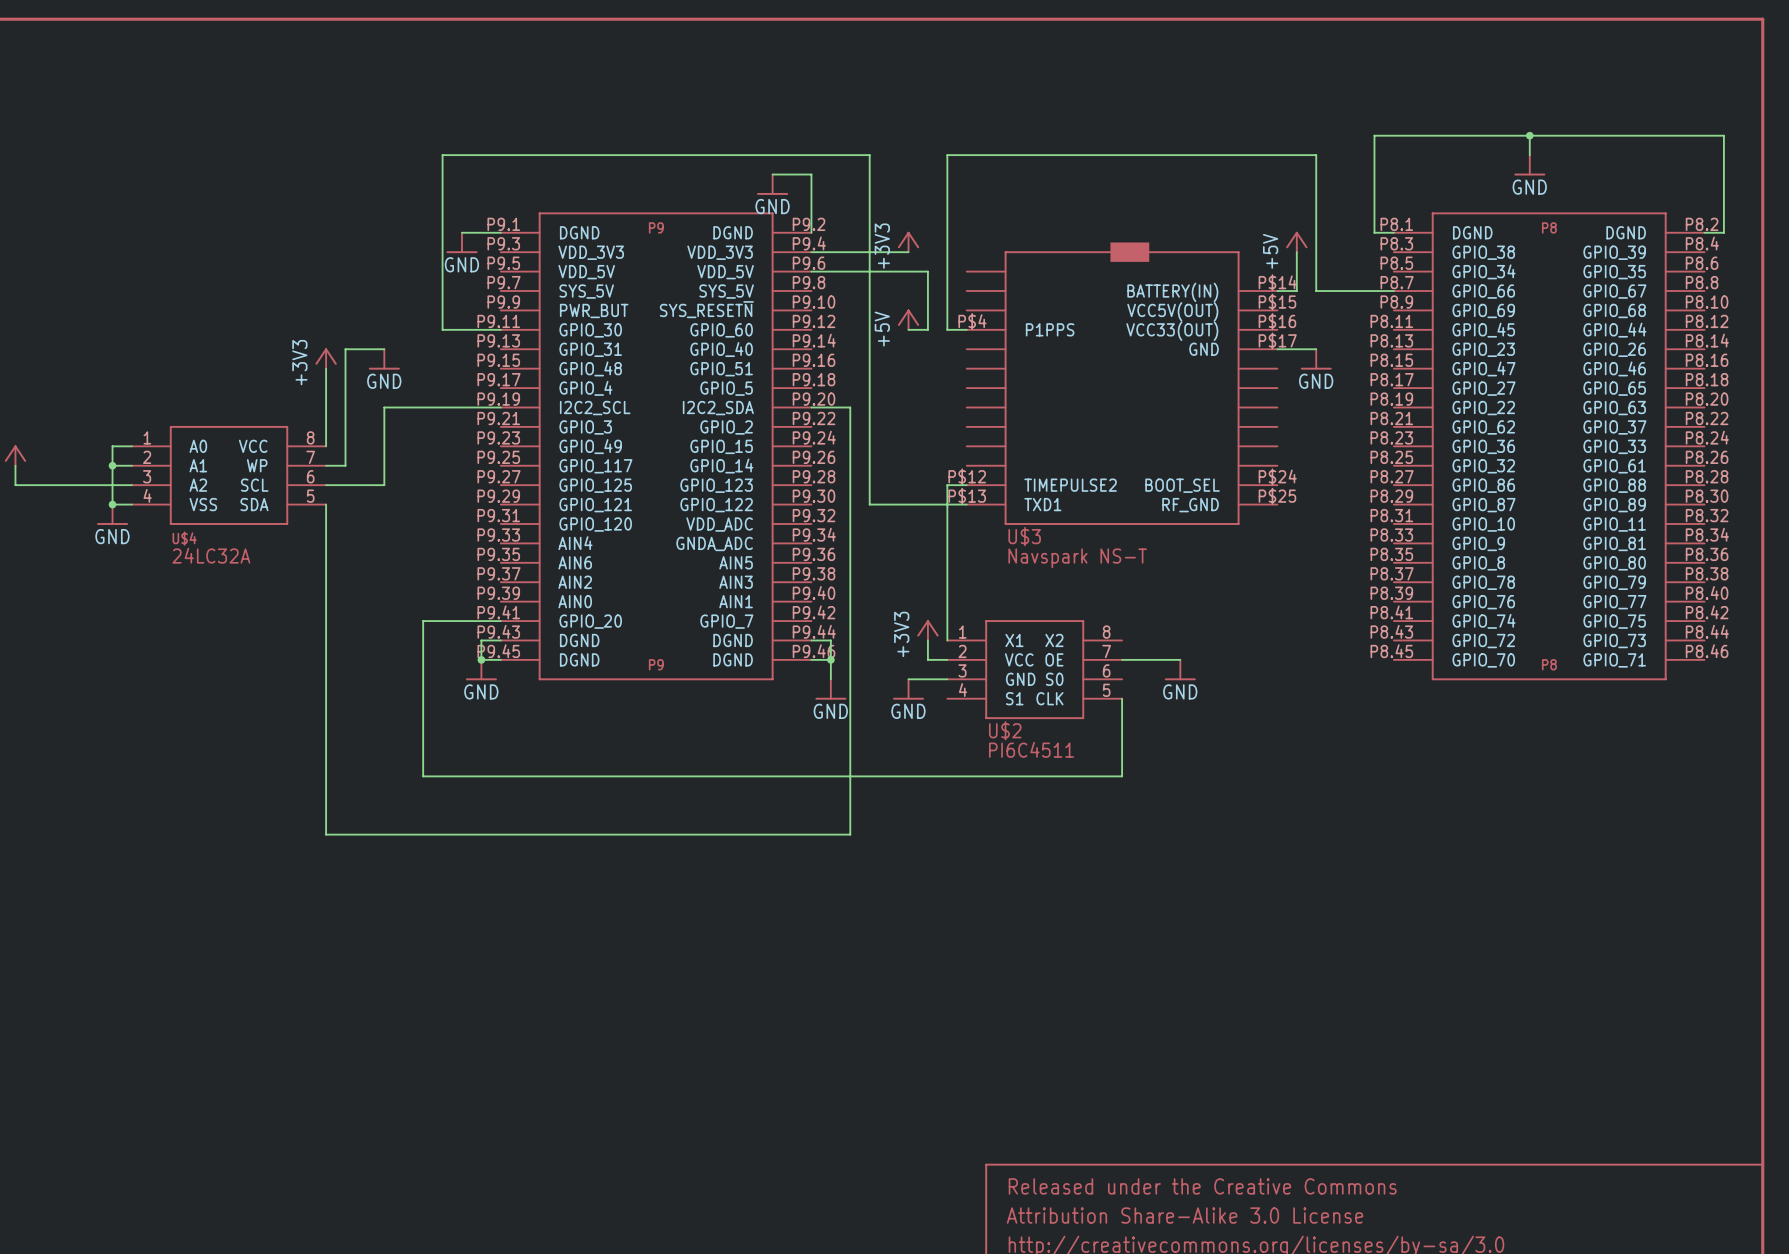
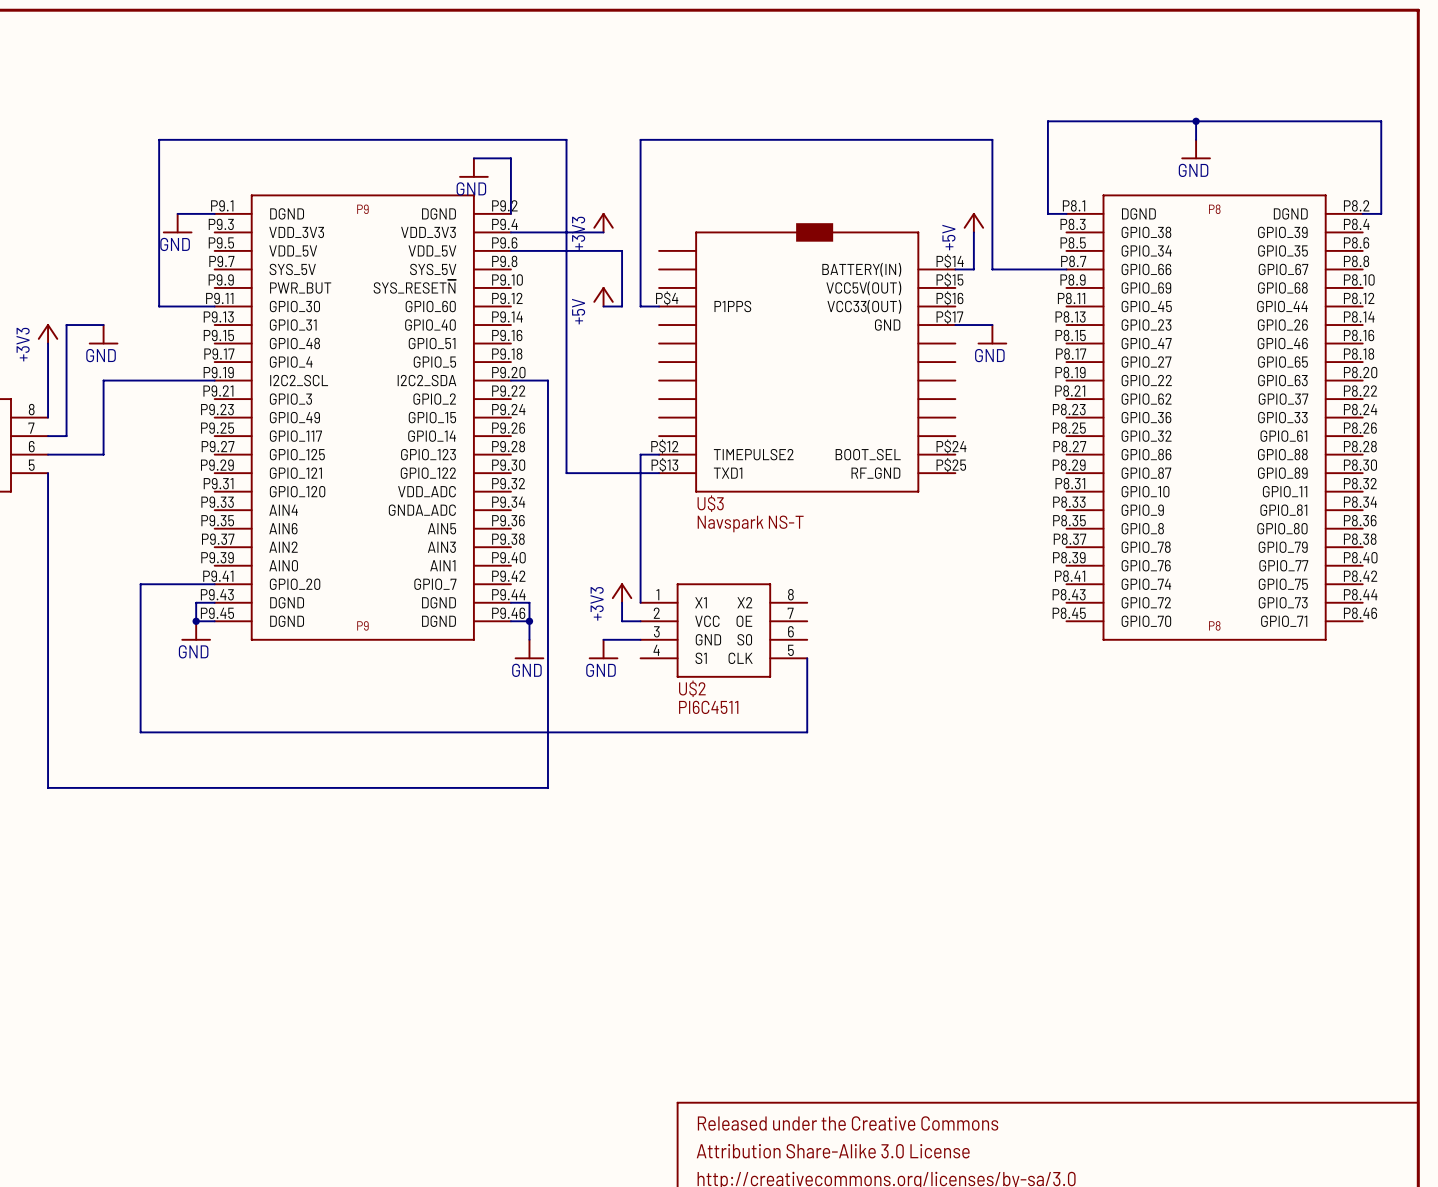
wire: (1122, 659) (1180, 659) -> none
power symbol: GND (1180, 670) -> none

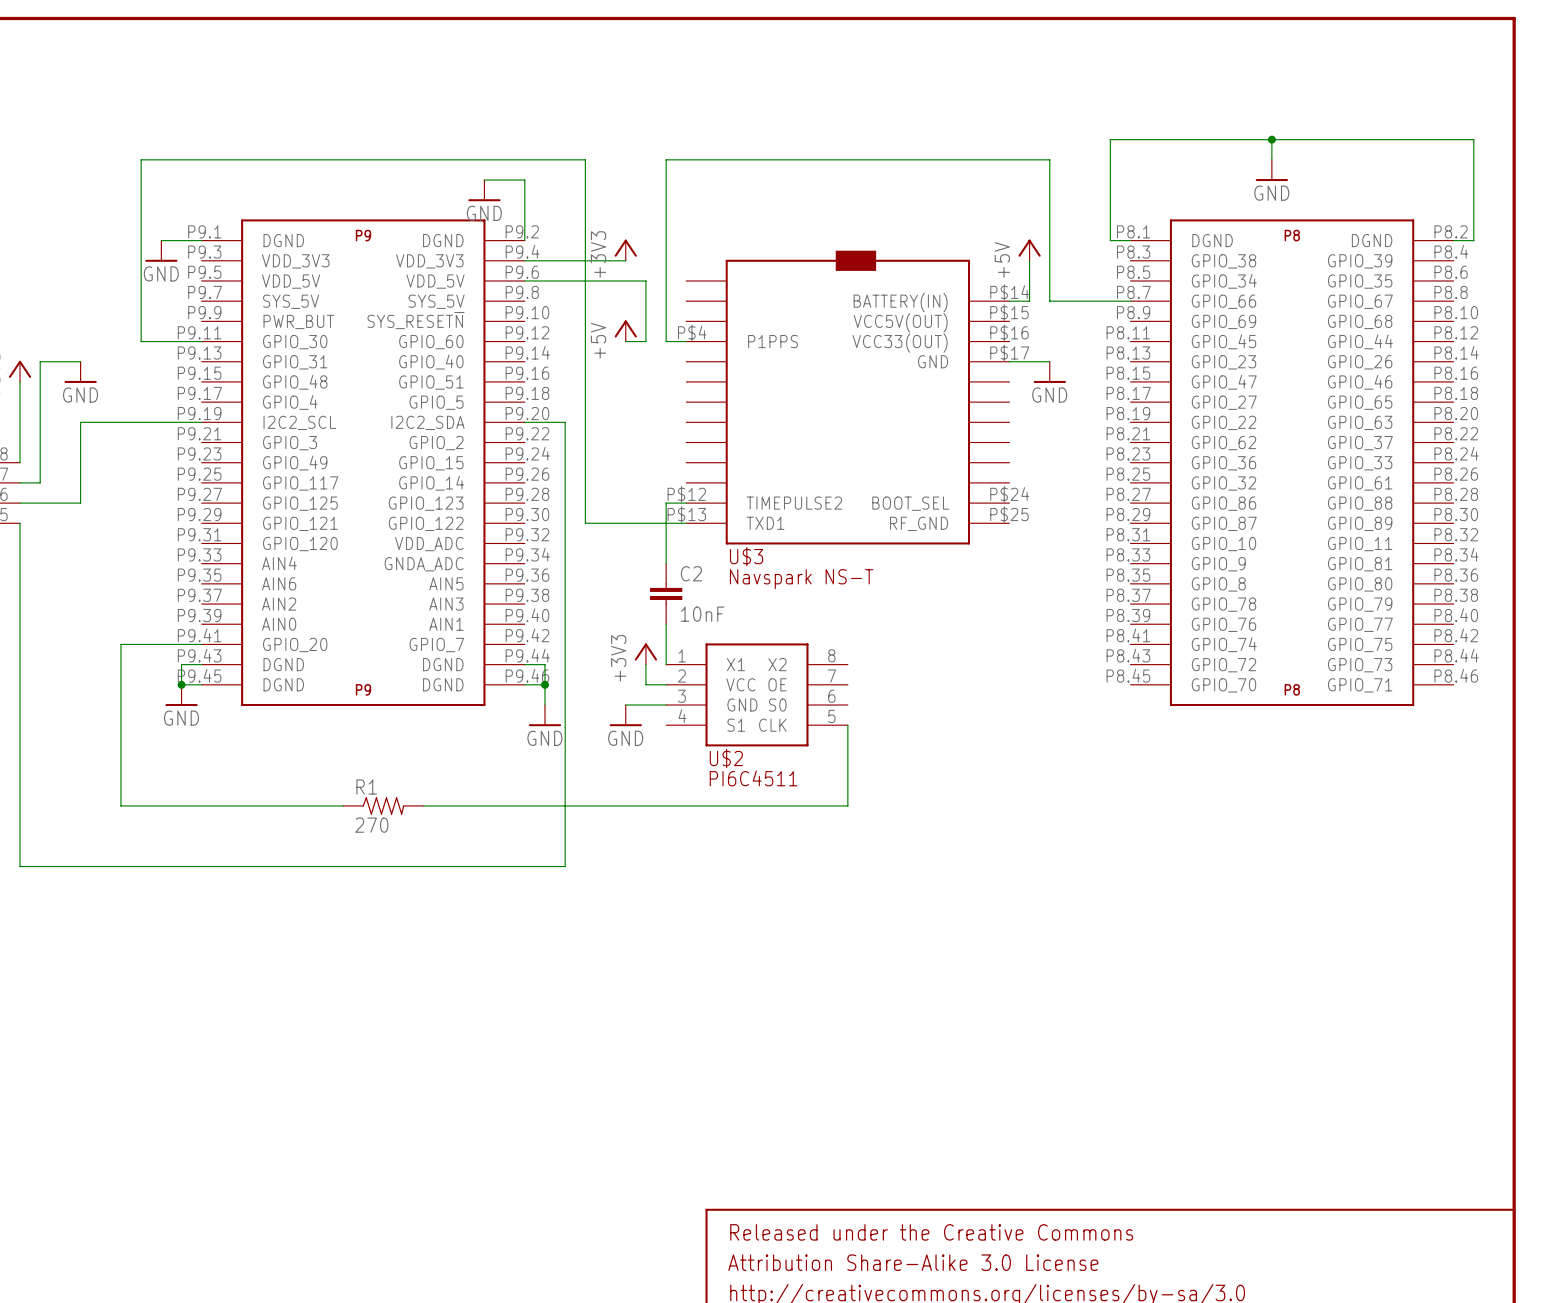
C2: none -> 10nF (666, 593)
R1: none -> 270 (383, 805)

